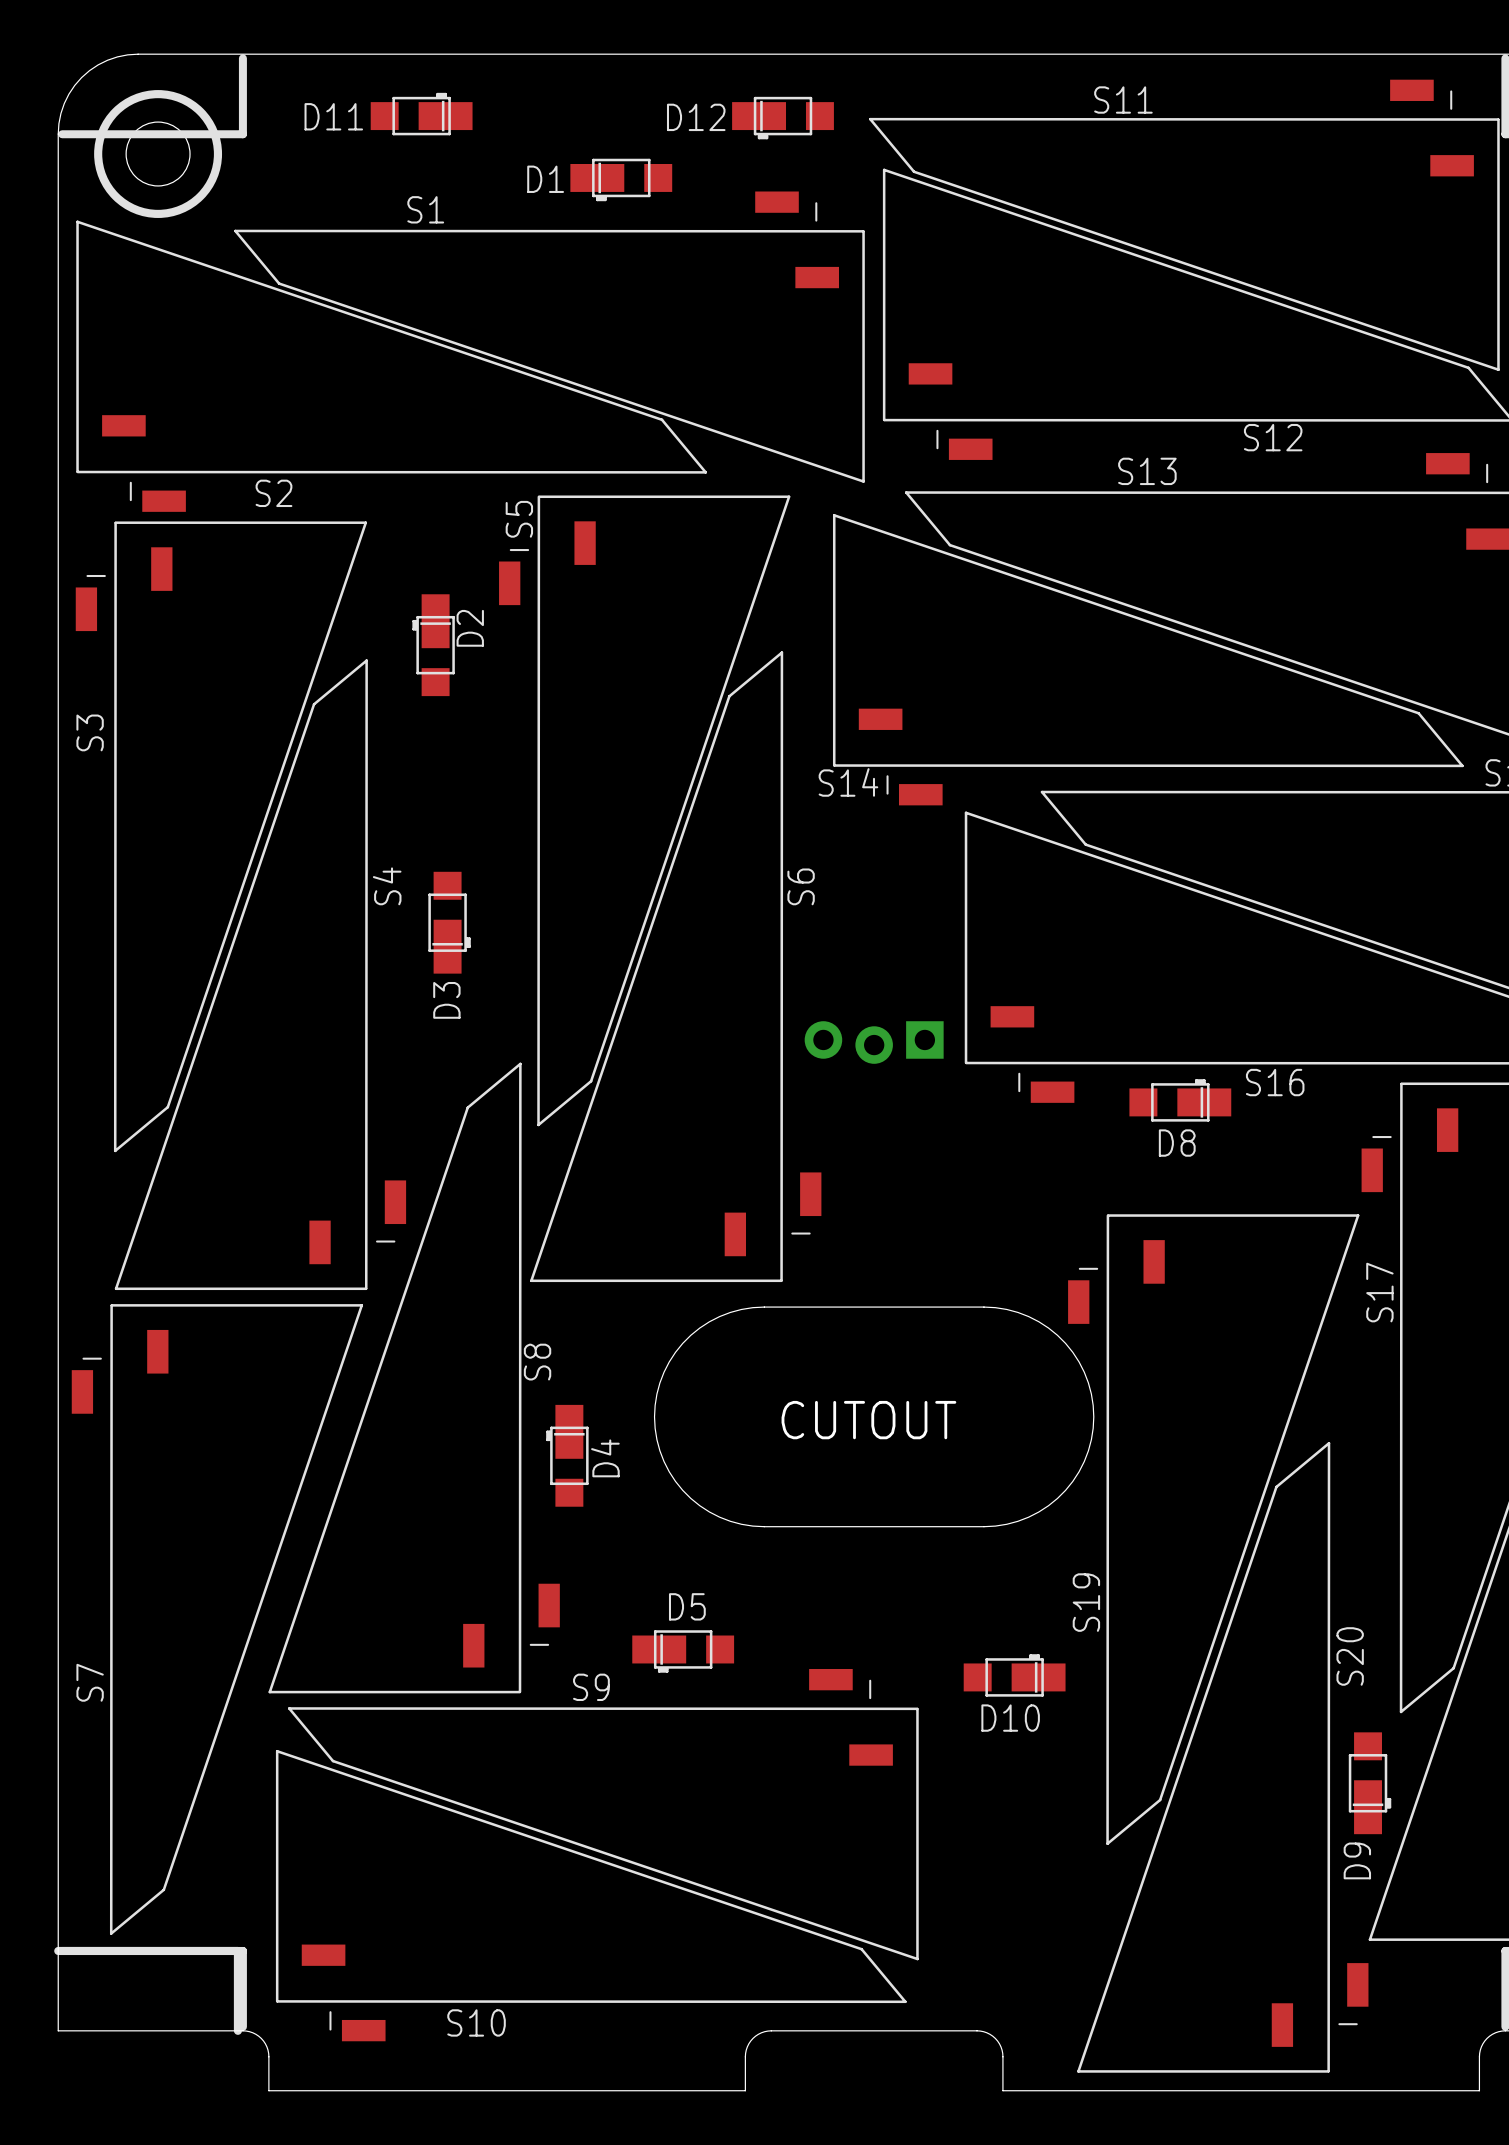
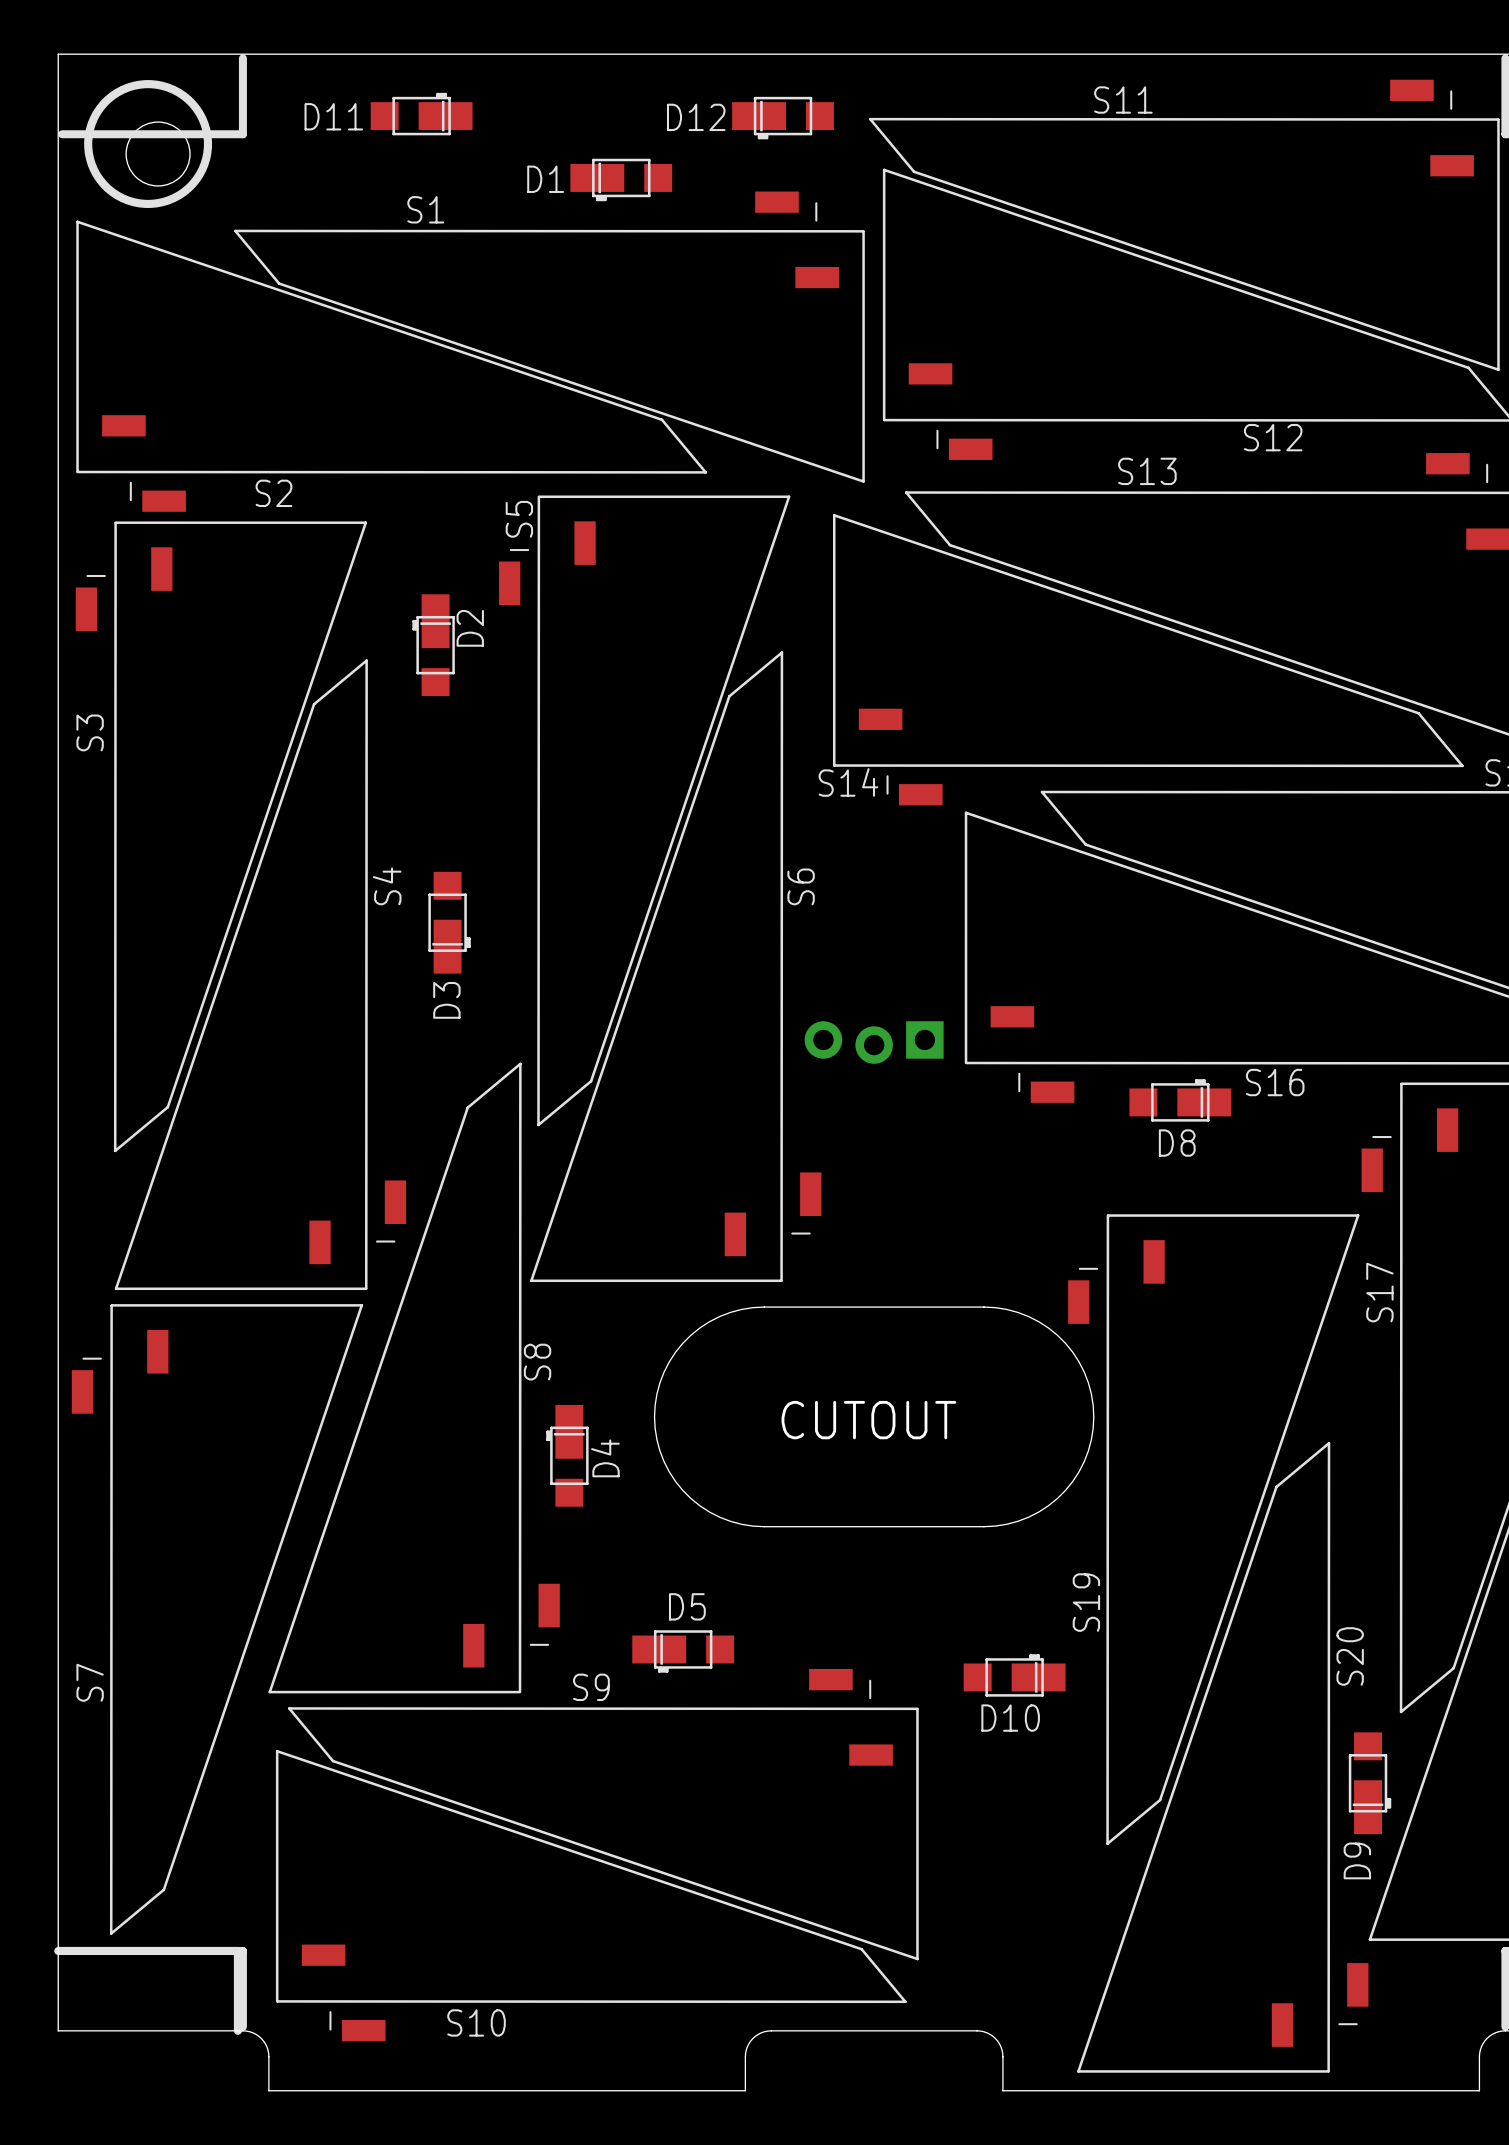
board edge: (138, 54) (107, 60) (81, 77) (64, 103) (58, 134) -> (138, 54) (58, 54) (58, 134)
drawing position: (158, 154) -> (148, 144)

